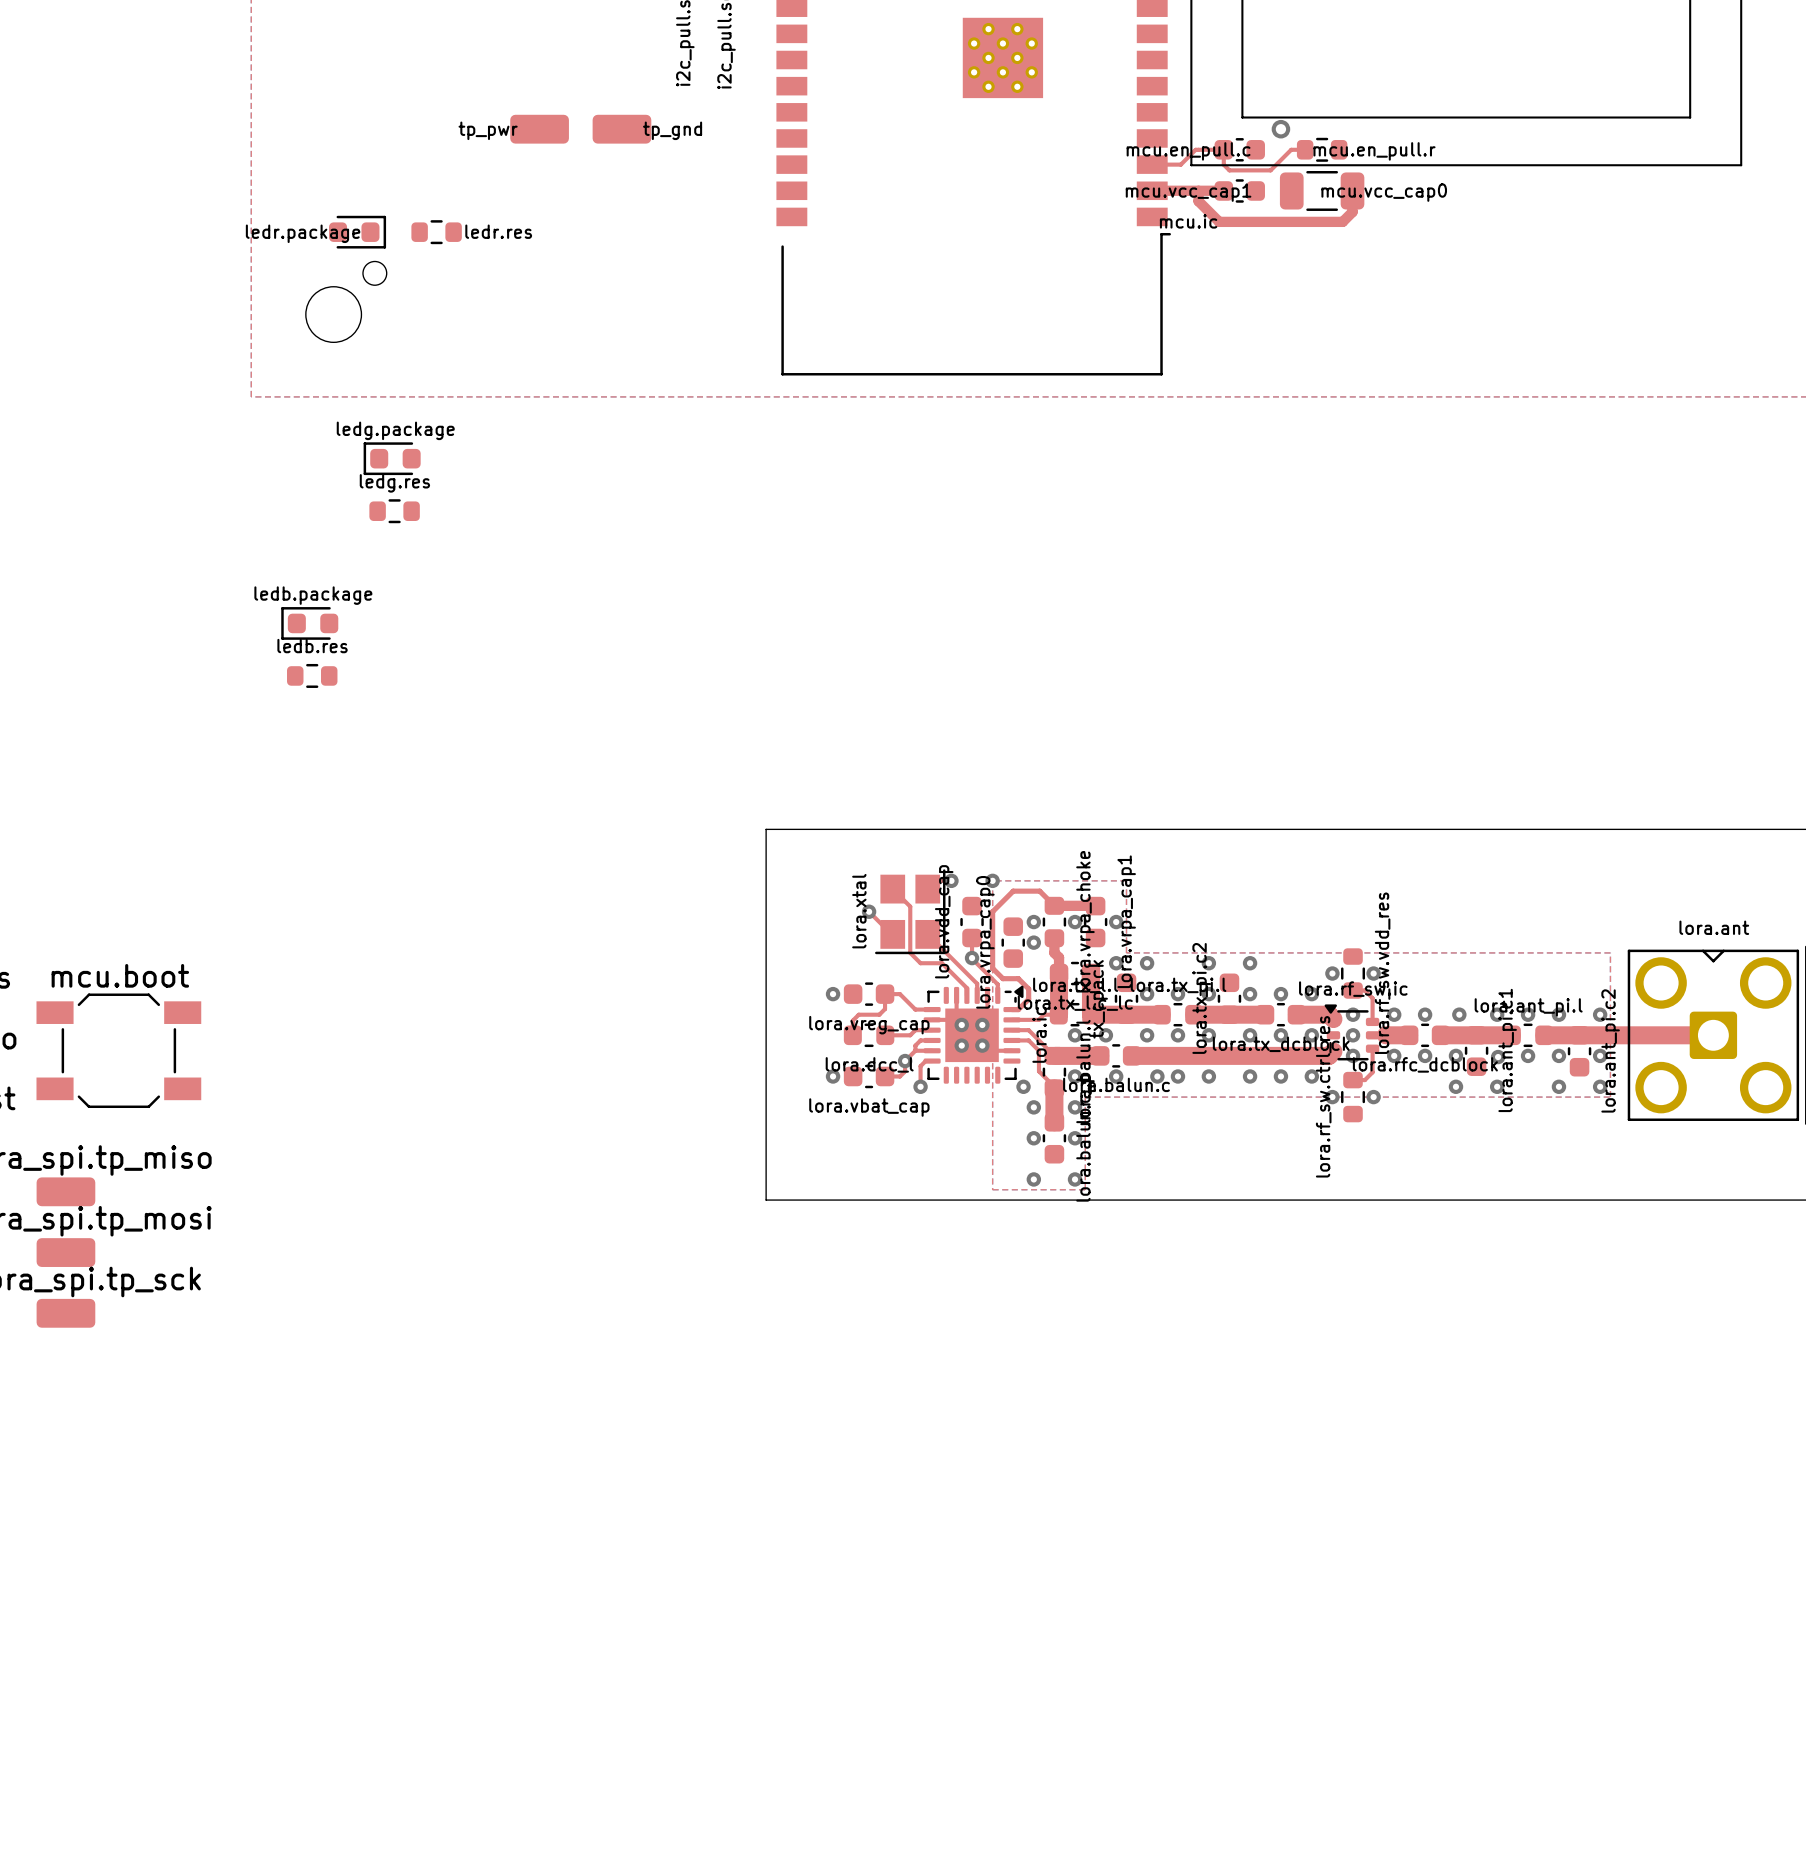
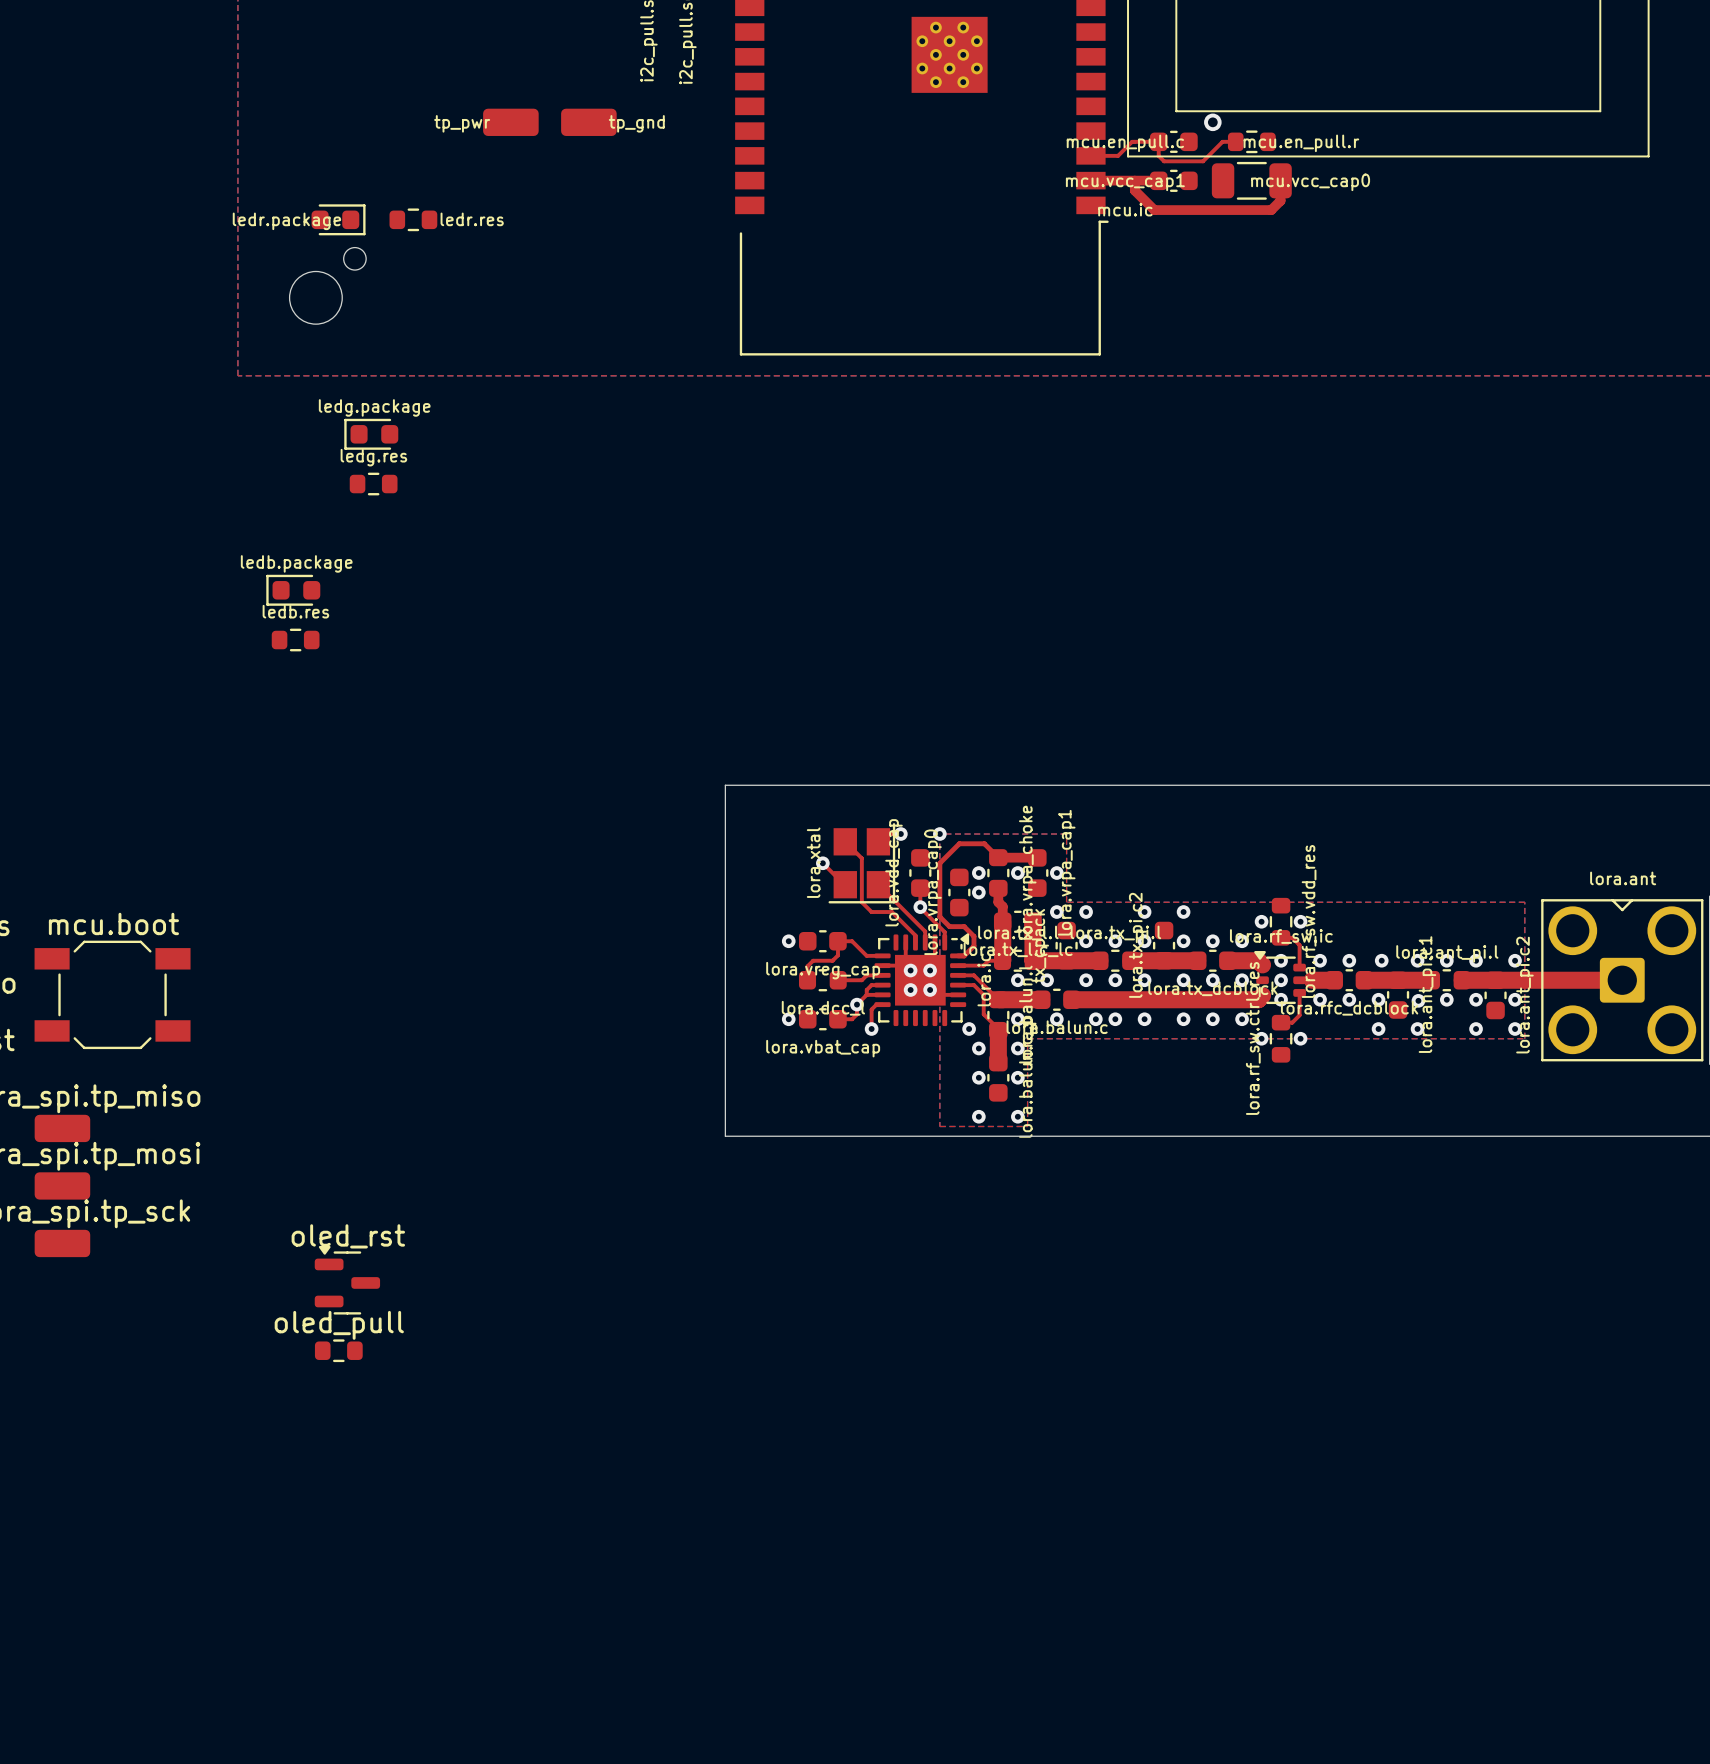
oled_rst: none -> (347, 1280)
oled_pull: none -> (338, 1350)

